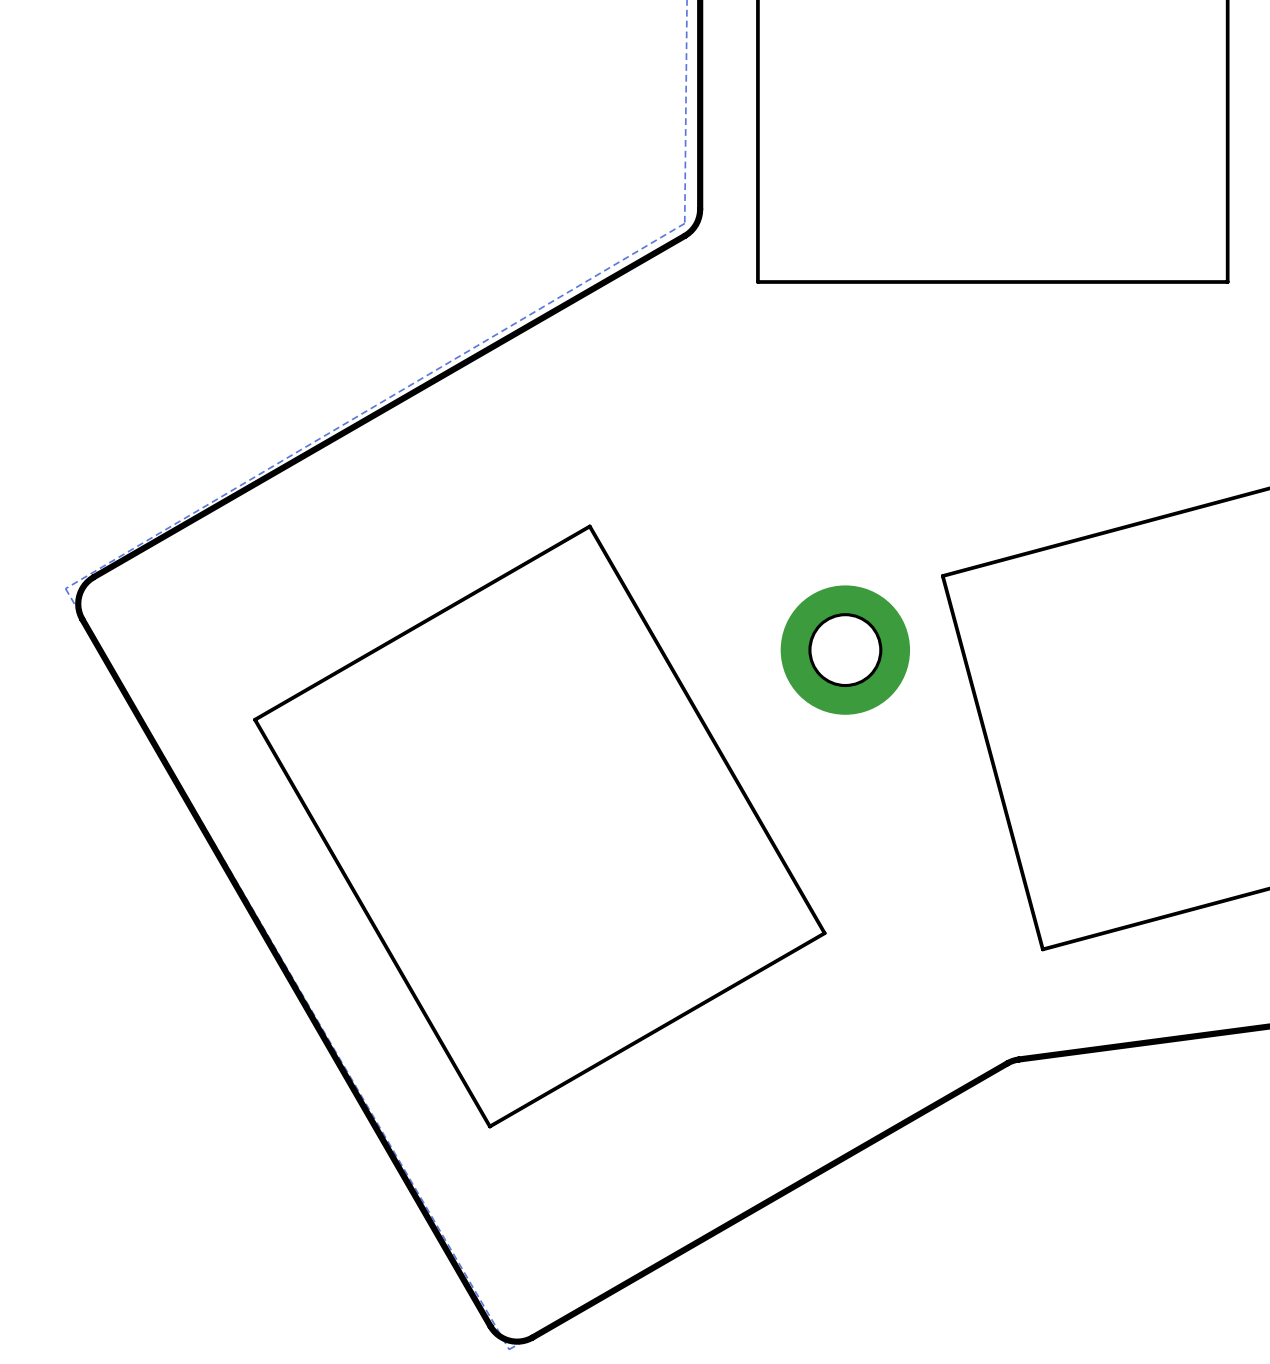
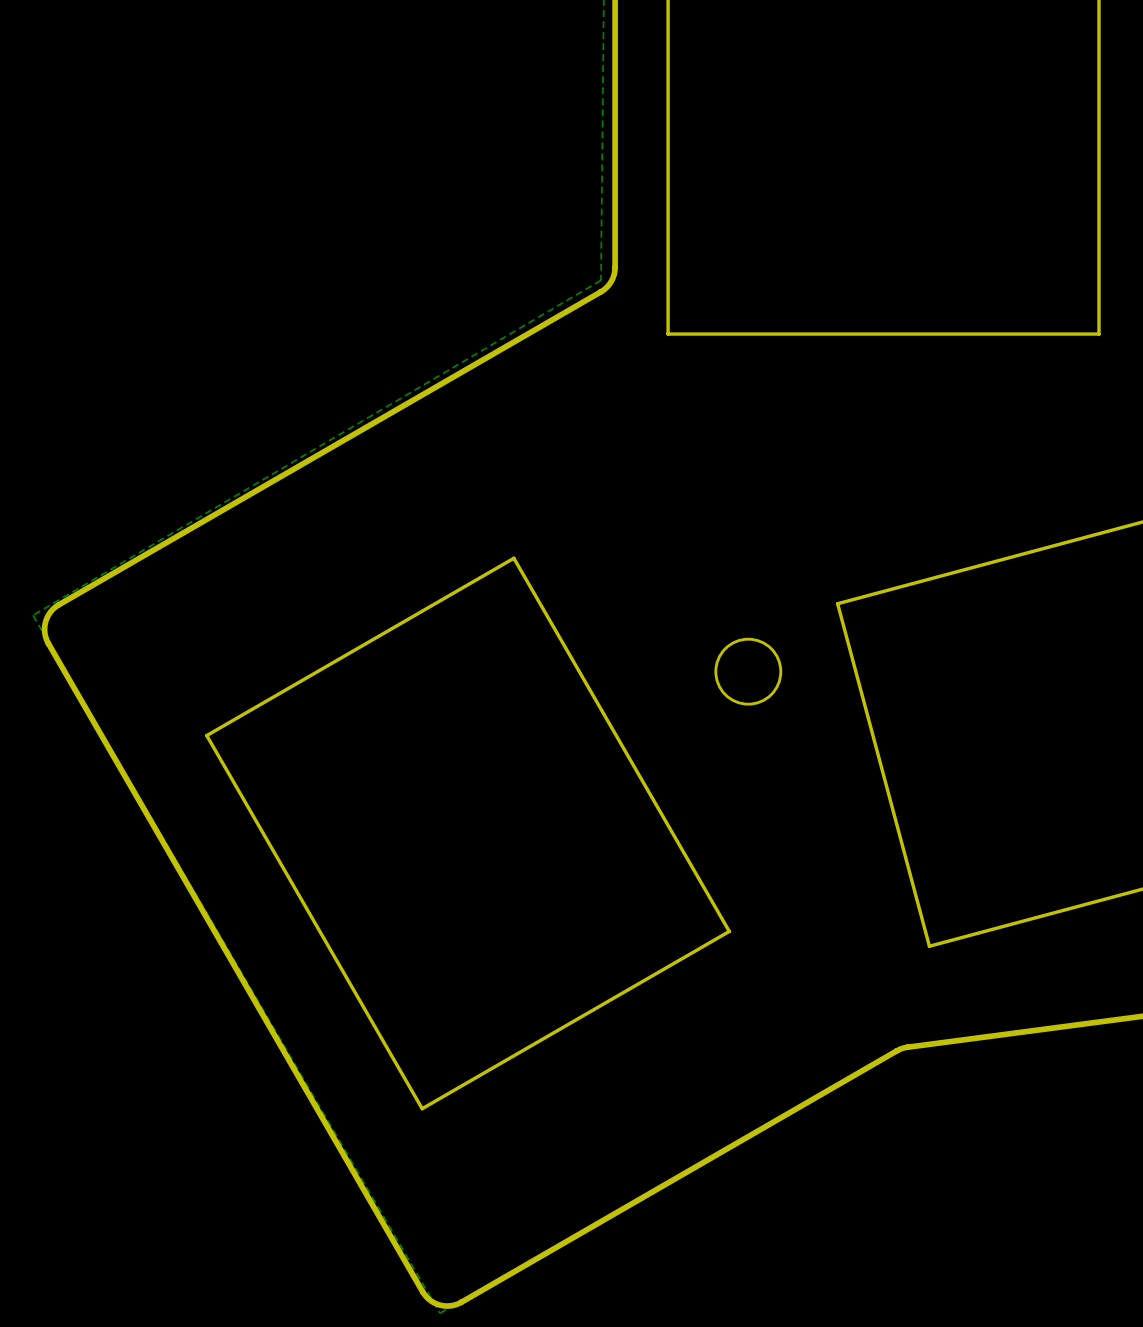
drawing: none -> [714, 637, 783, 706]
part: (845, 650) -> none

